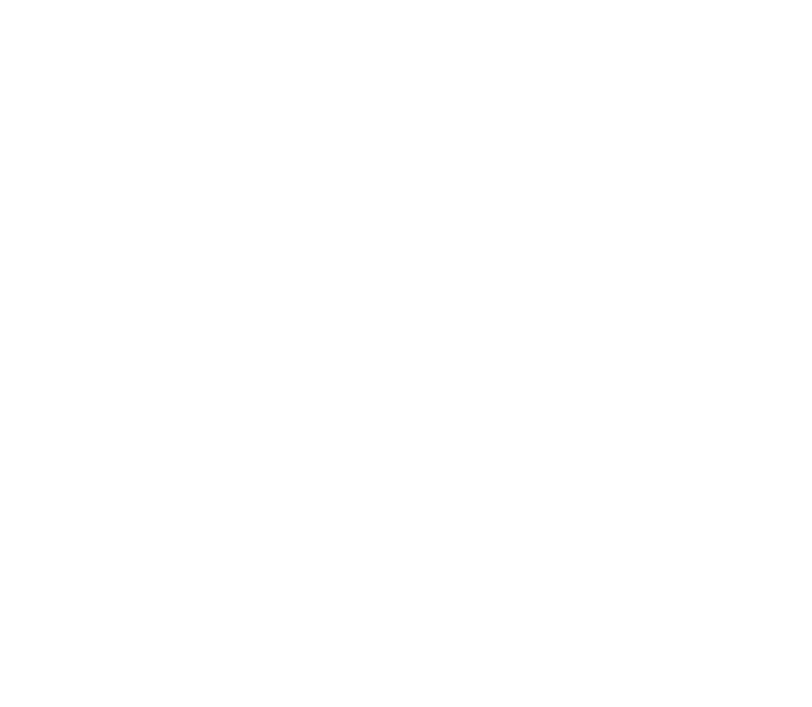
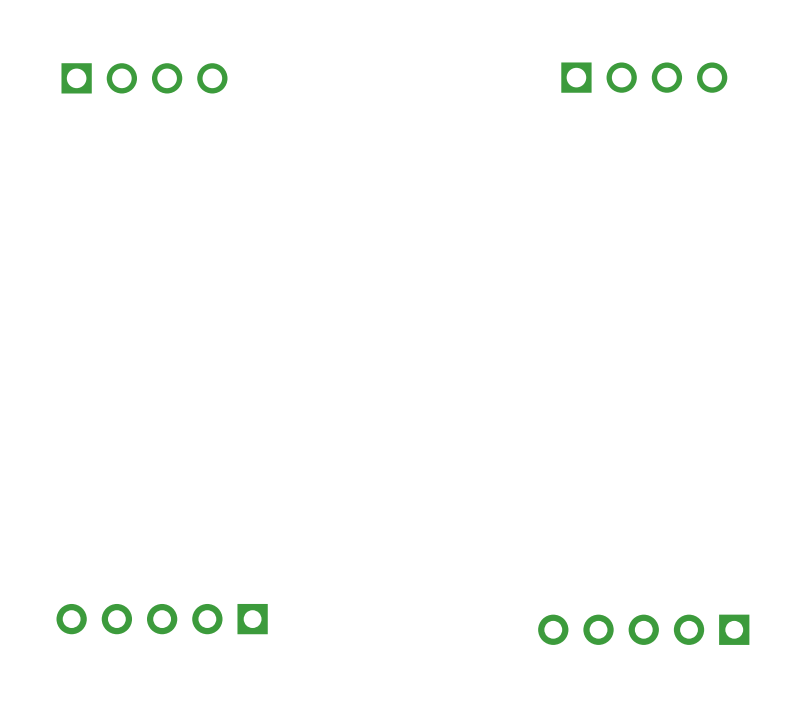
part: none -> (644, 77)
part: none -> (144, 78)
part: none -> (162, 619)
part: none -> (643, 629)

